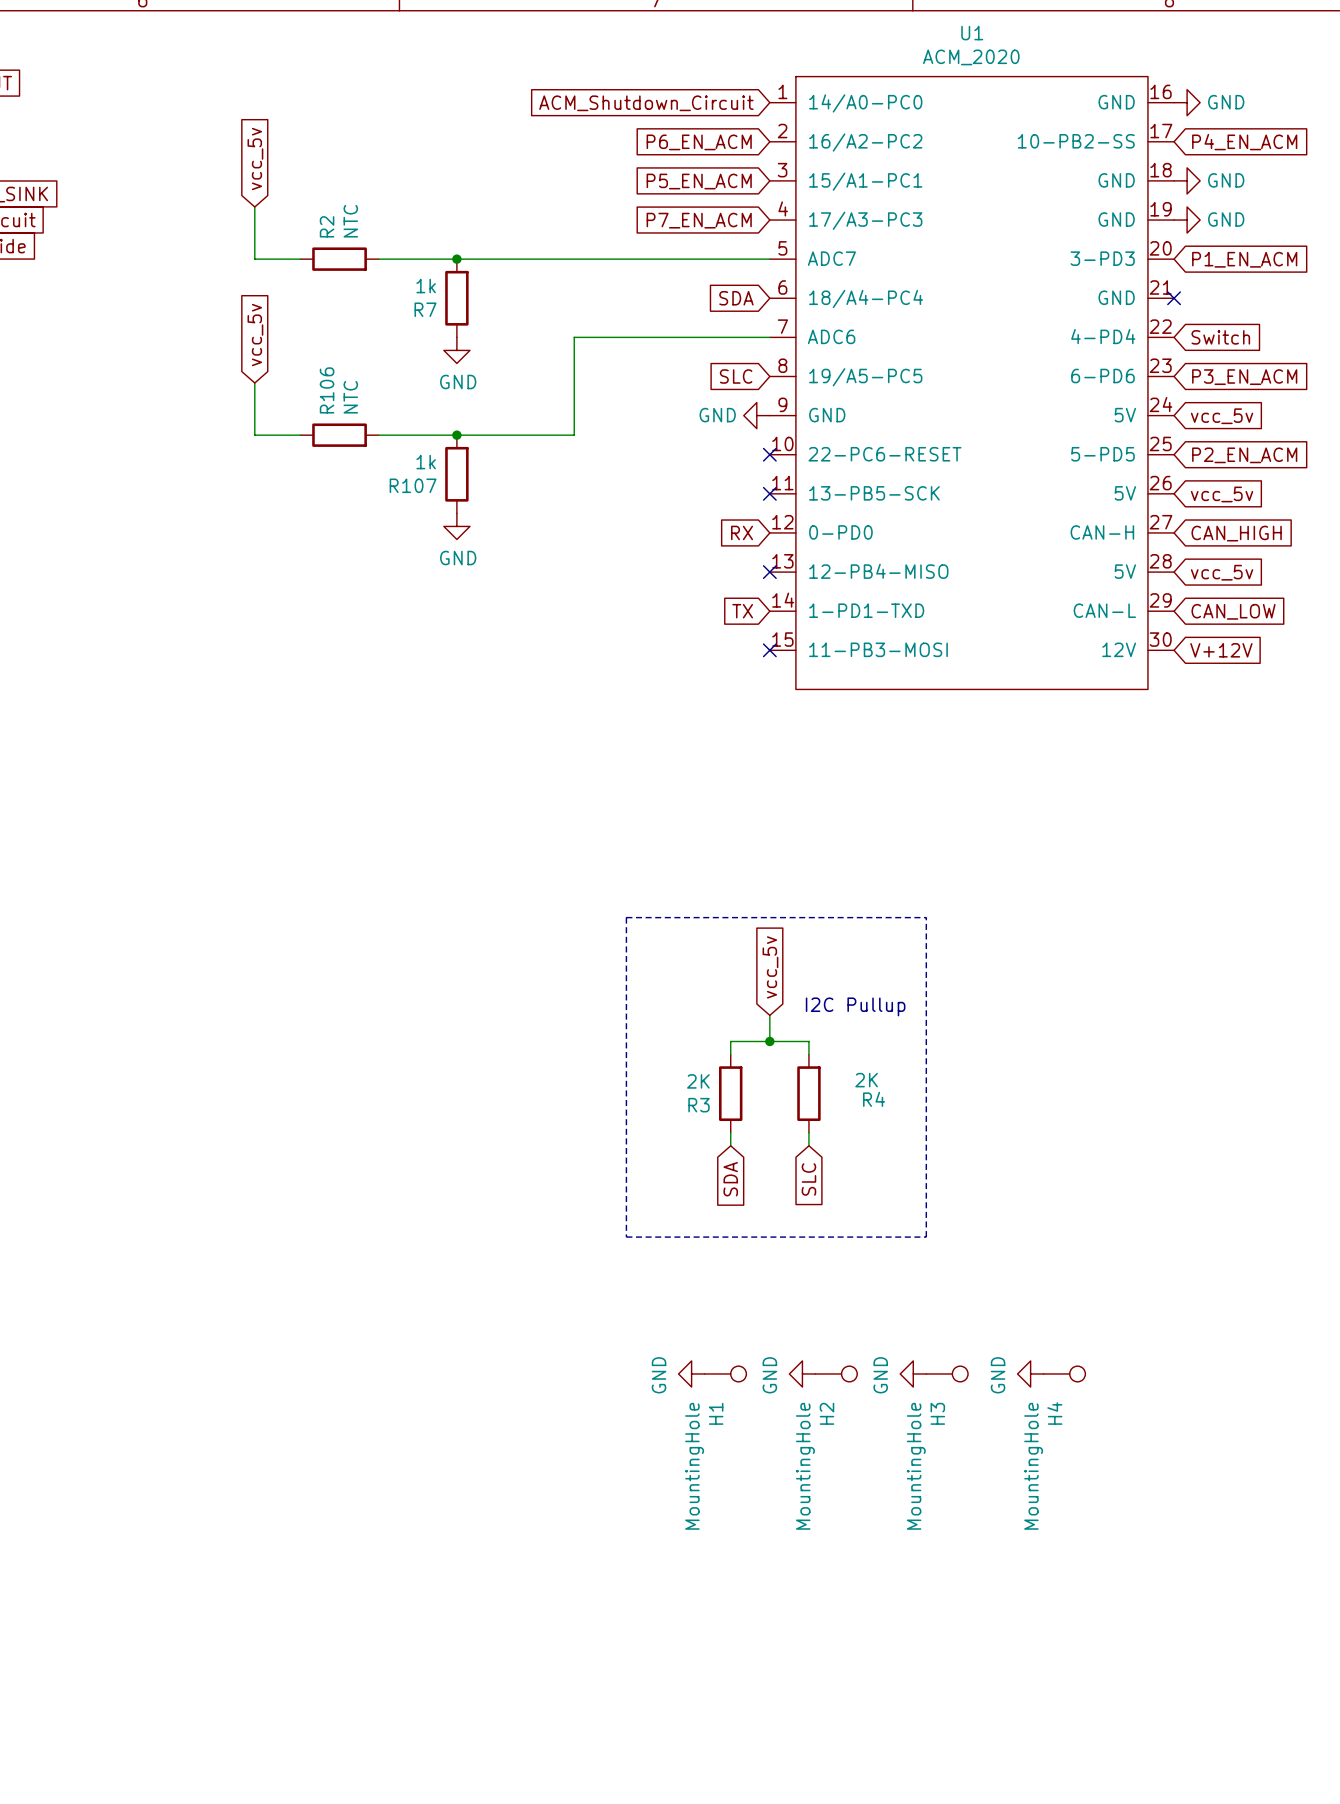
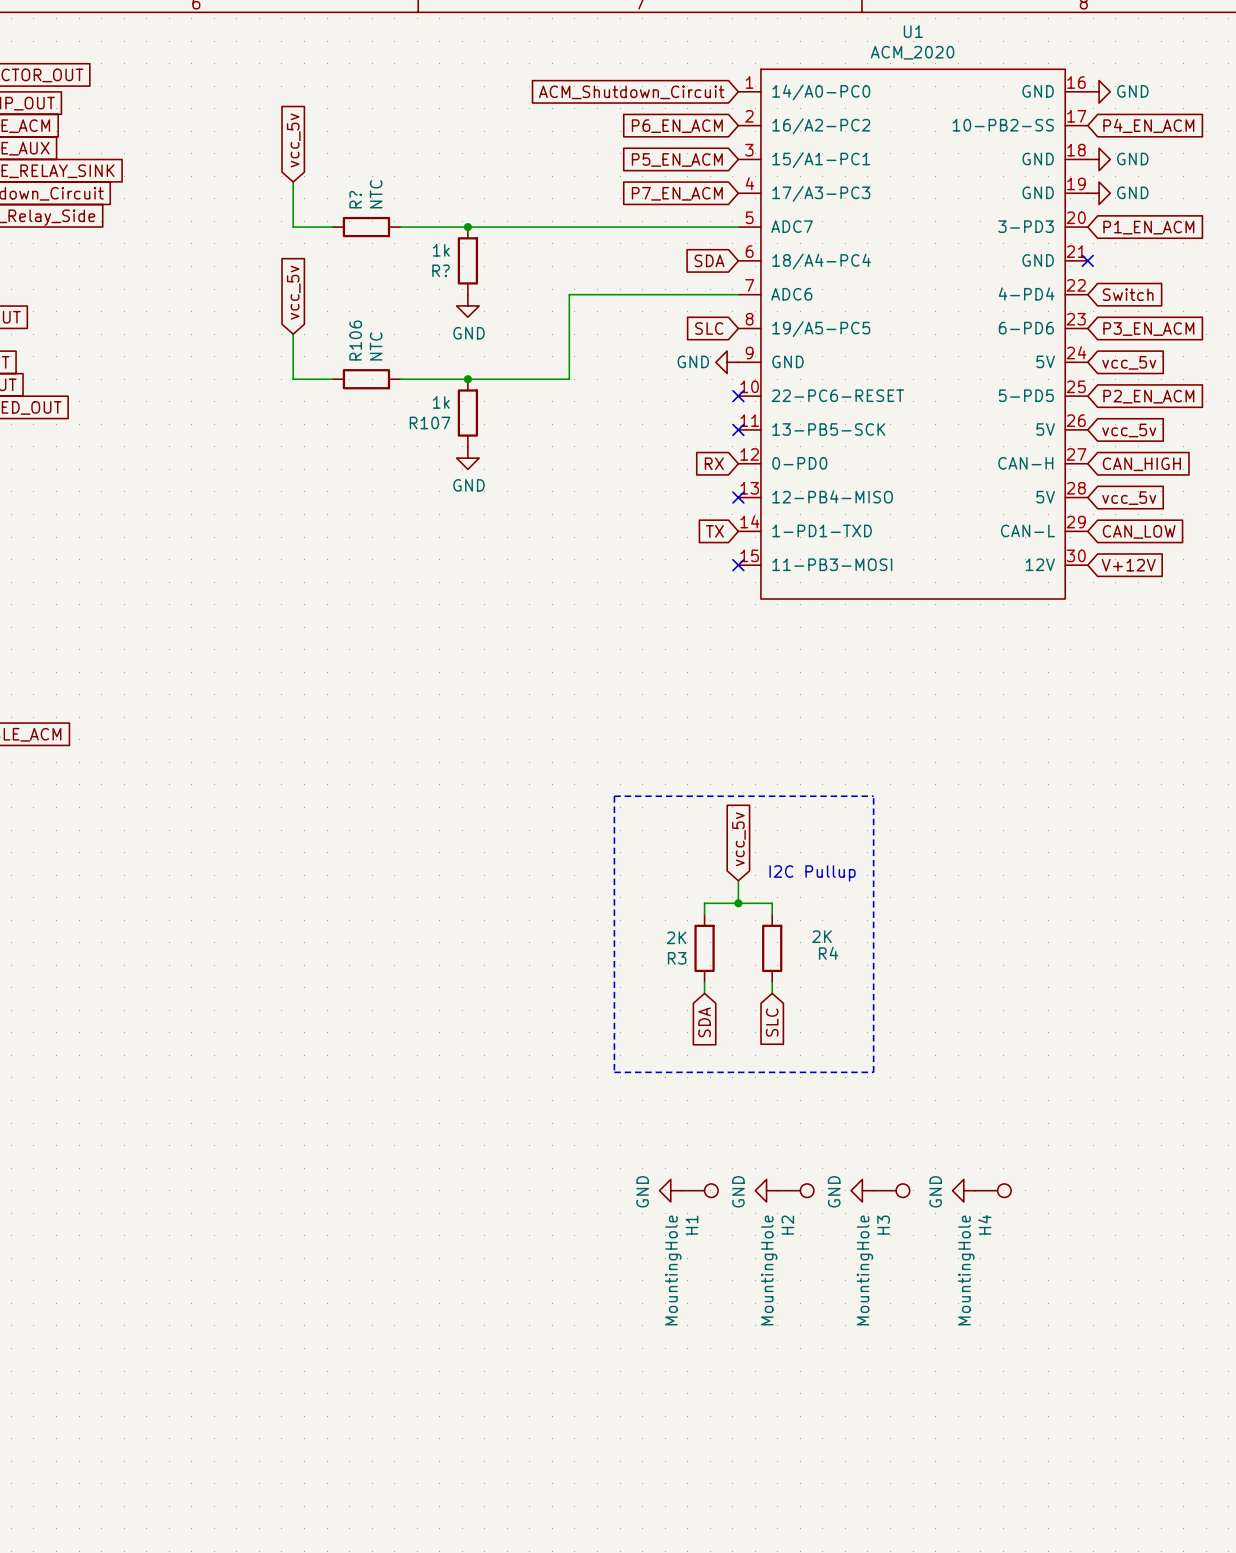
R2 name: R2 (327, 226) -> R? (355, 199)
R7 name: R7 (425, 309) -> R? (441, 270)

